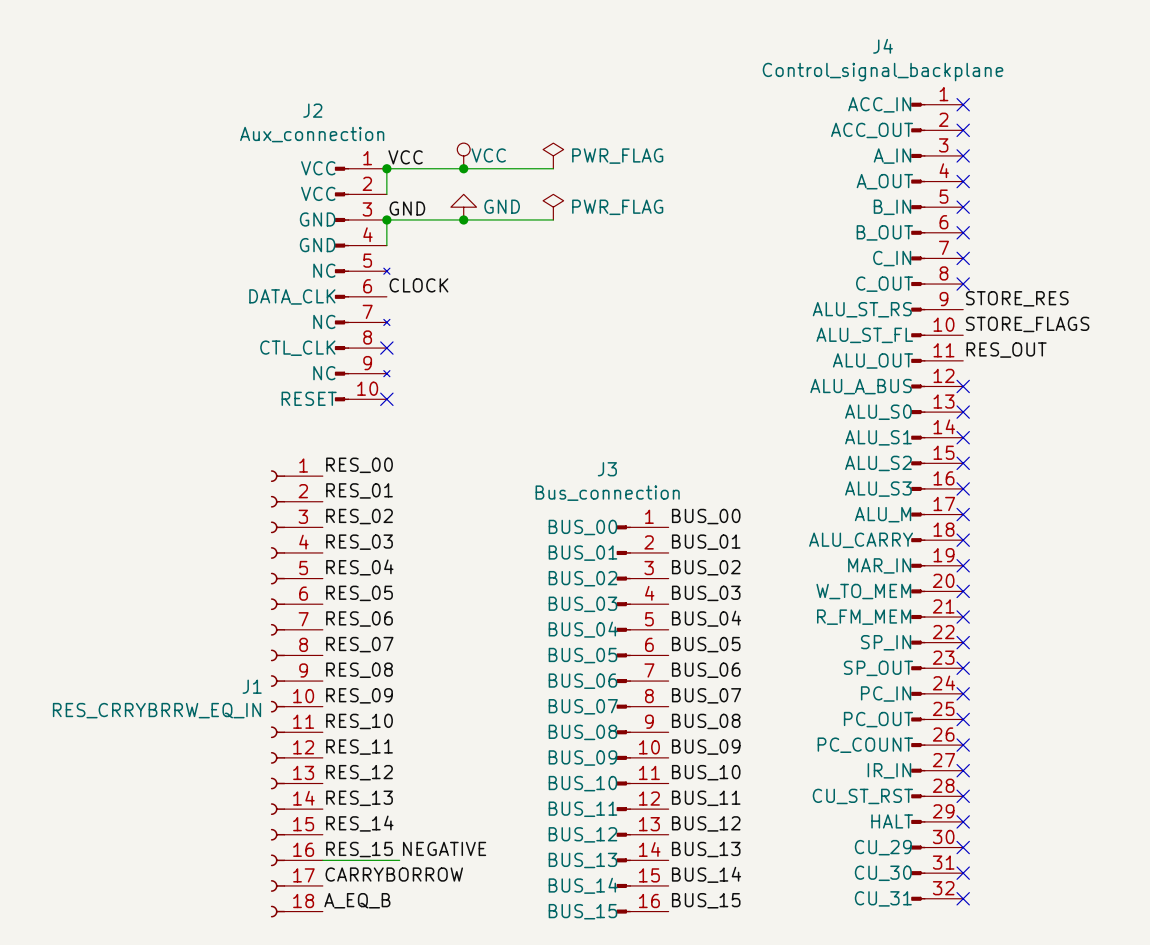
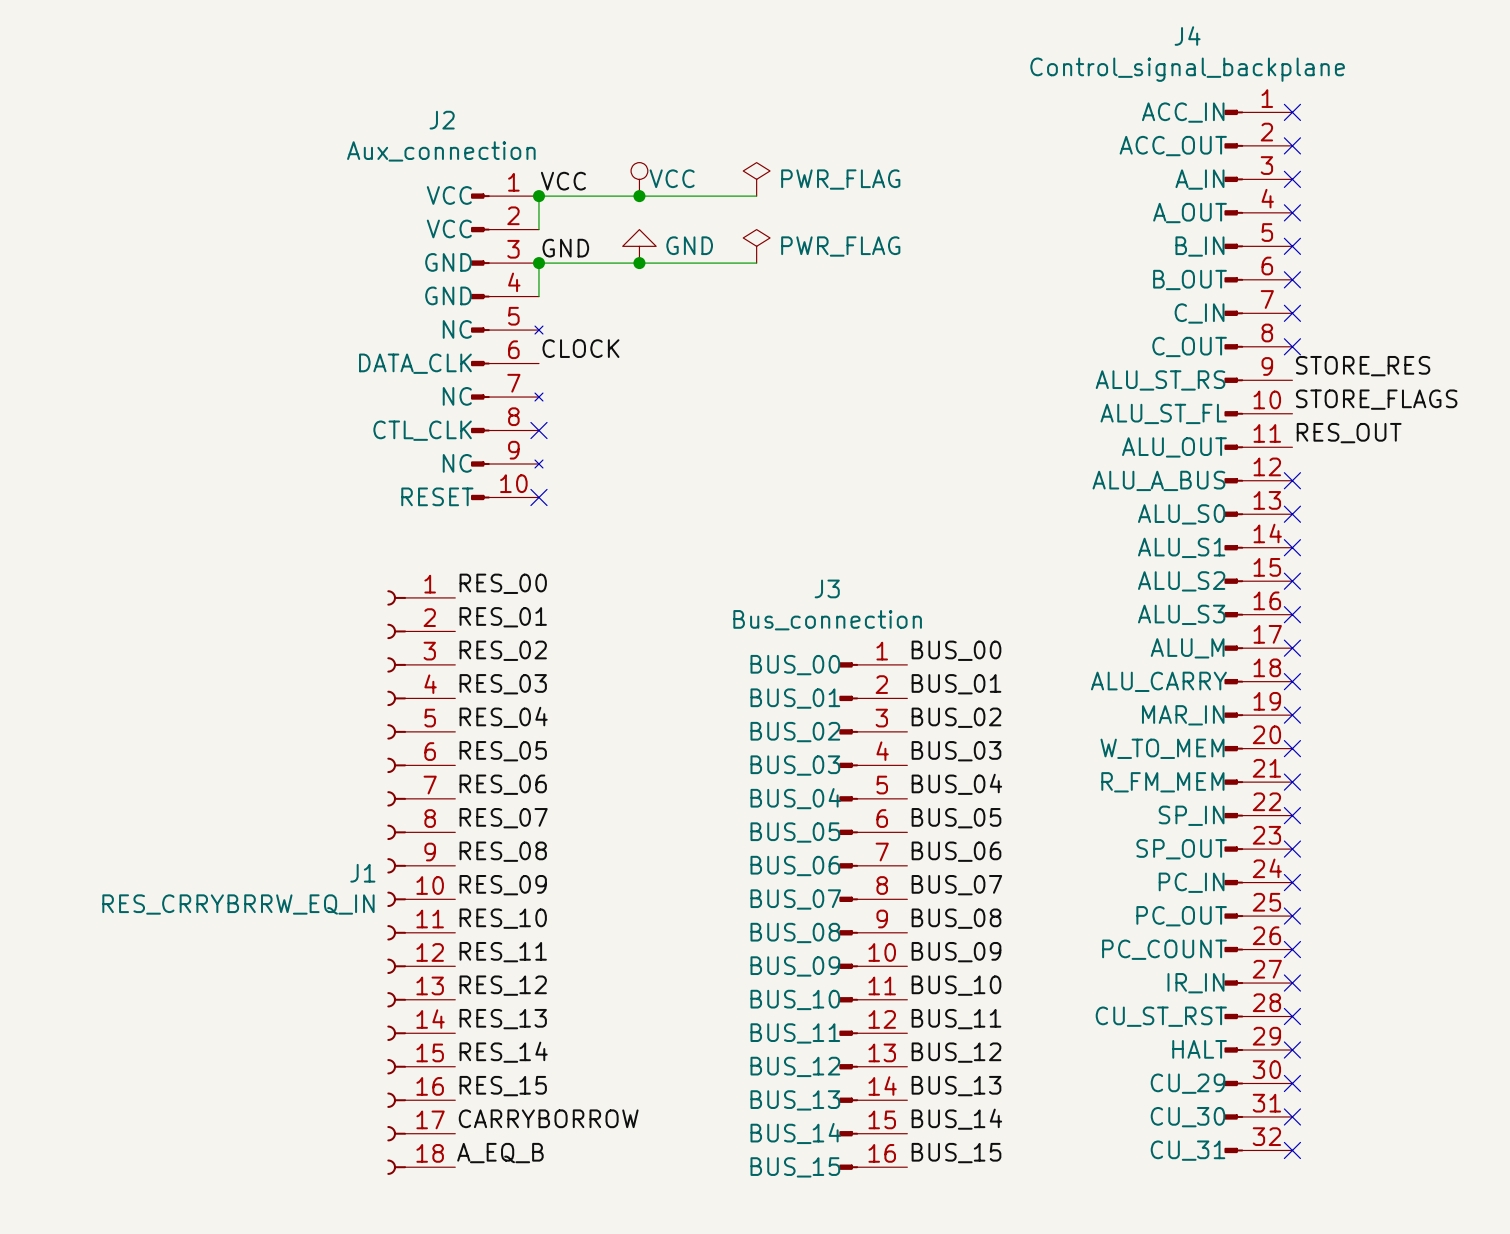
label: NEGATIVE (444, 848) -> none
wire: (322, 860) (399, 860) -> none

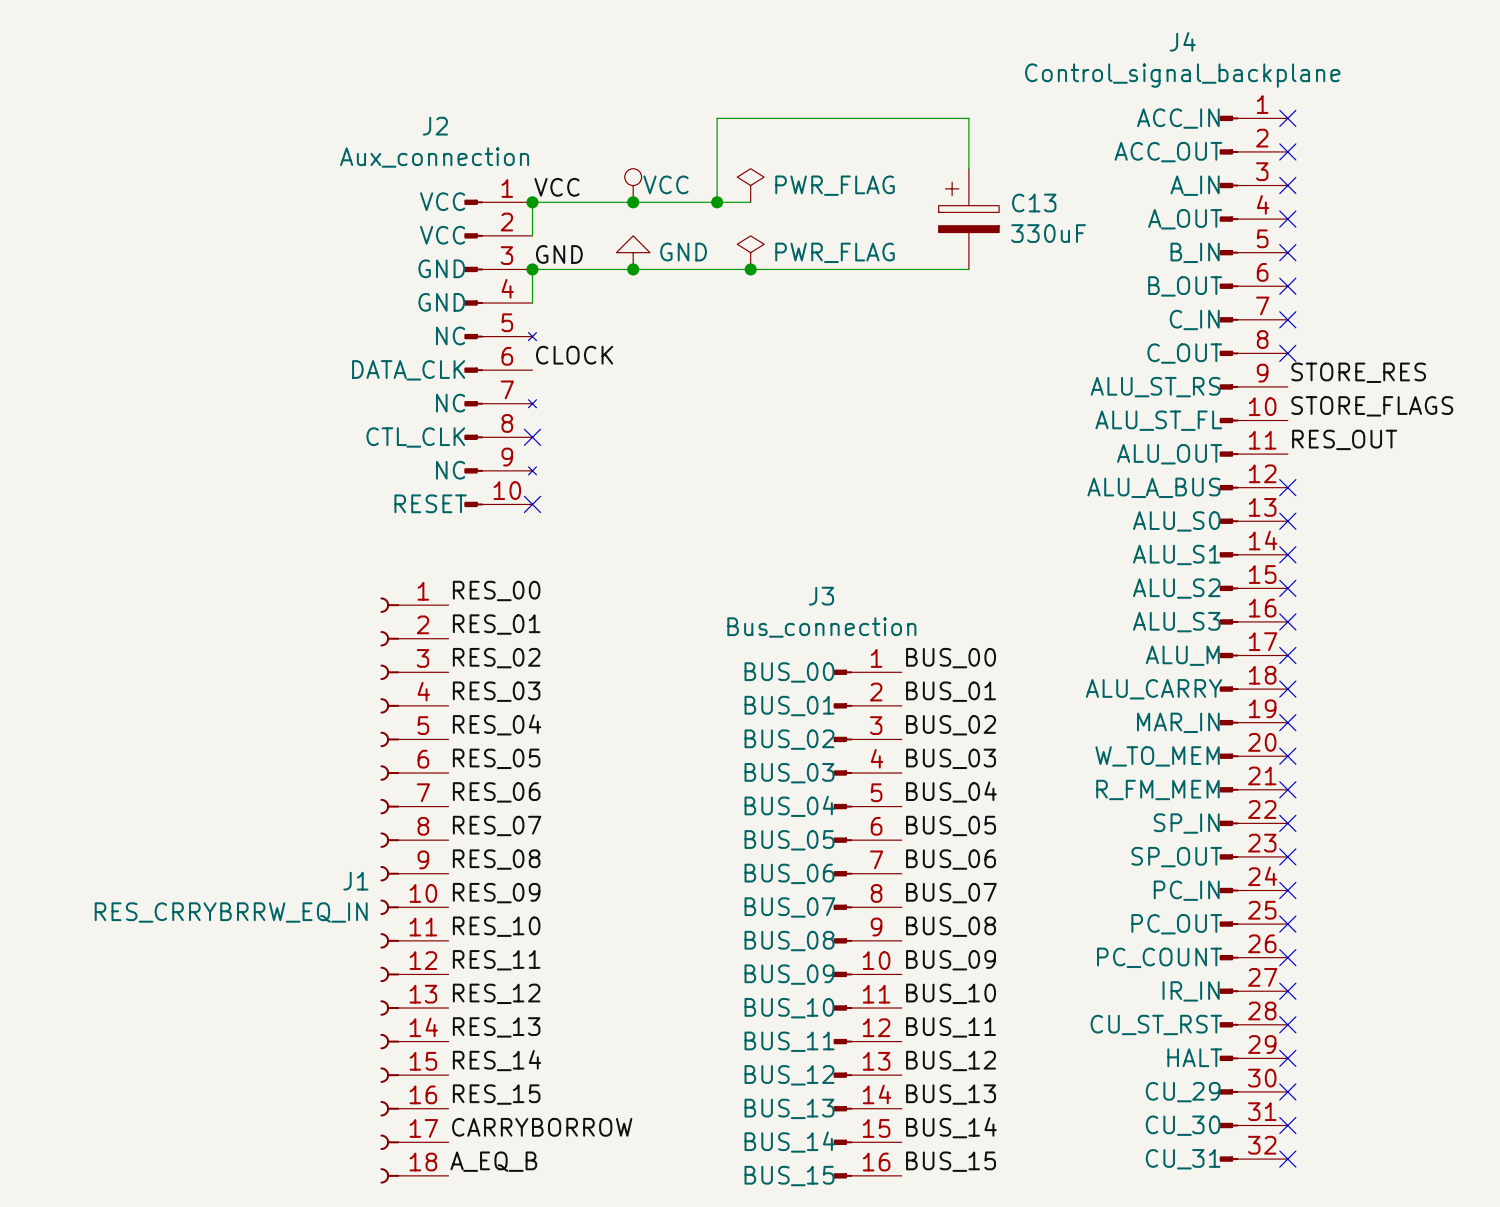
wire: none -> (968, 168) (968, 118) (717, 118) (717, 202)
junction: none -> (717, 202)
C13: none -> 330uF (968, 219)
wire: none -> (750, 269) (968, 269)
junction: none -> (750, 269)

